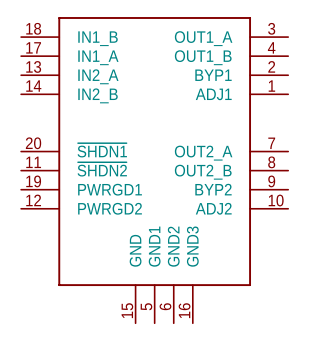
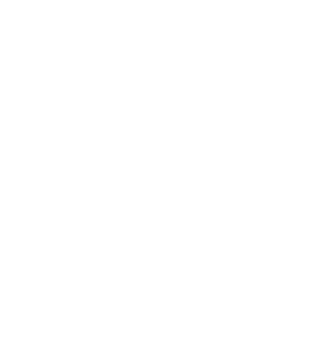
part: (154, 170) -> none

